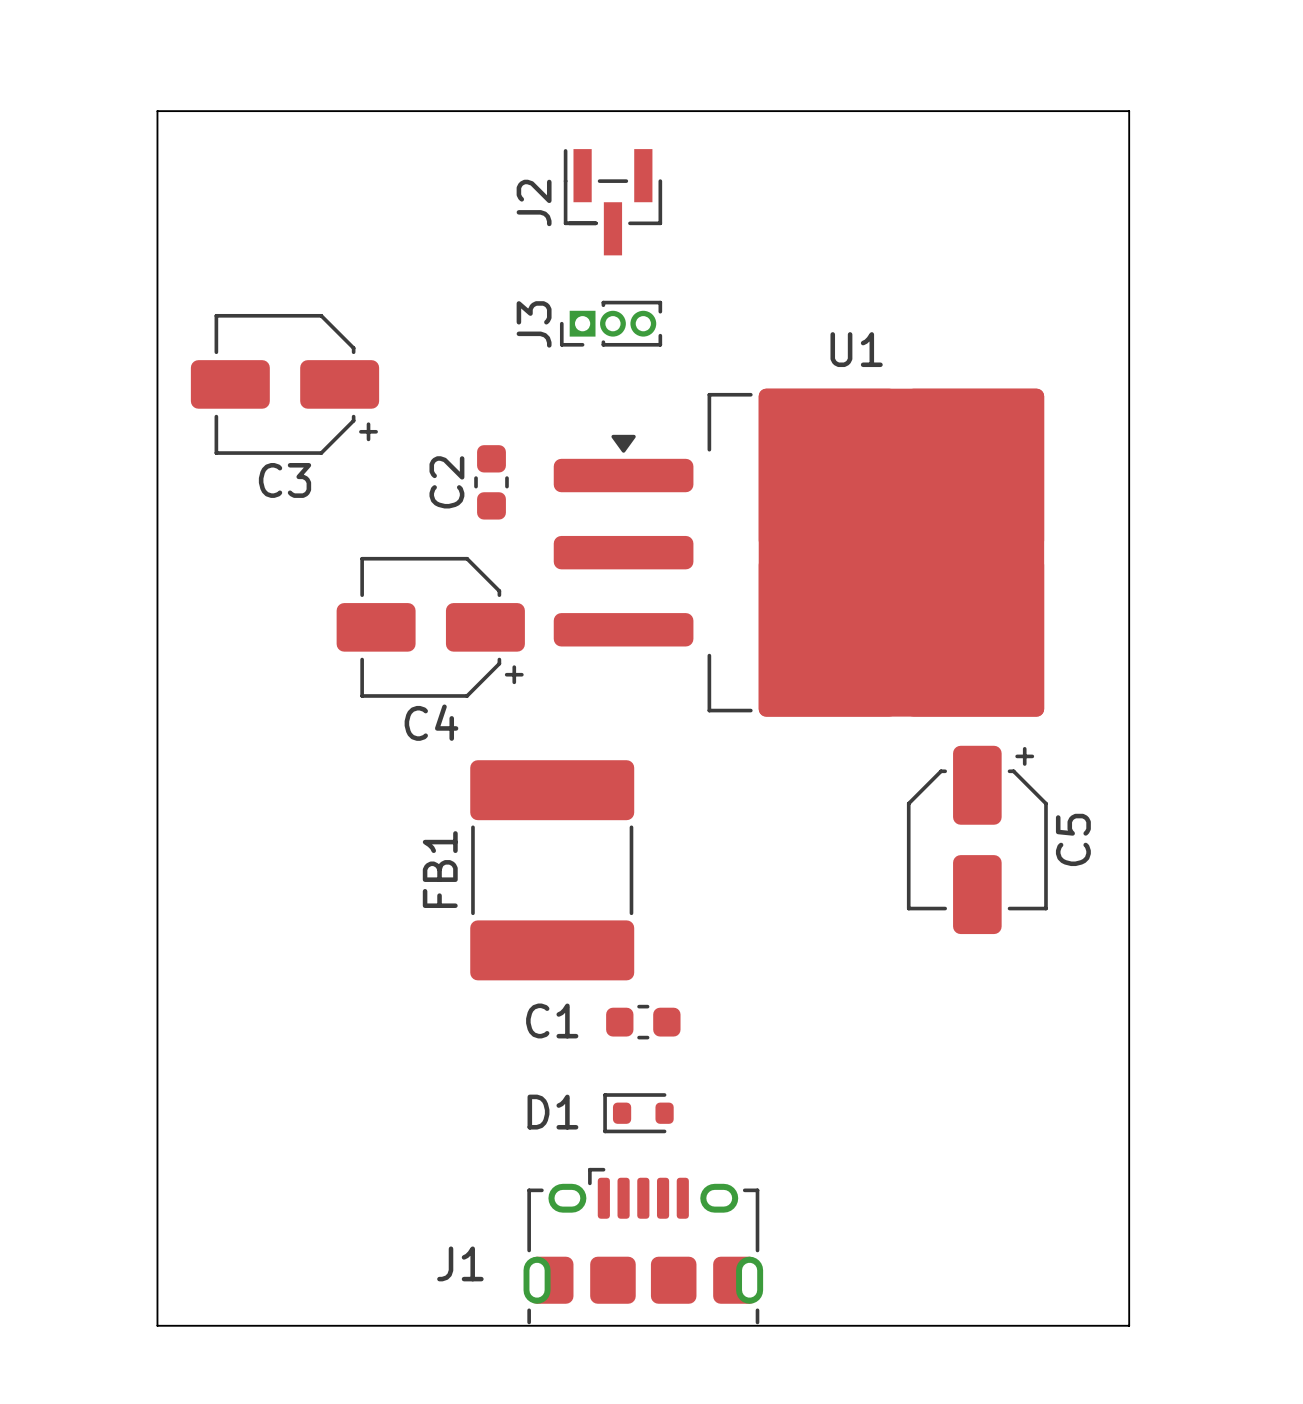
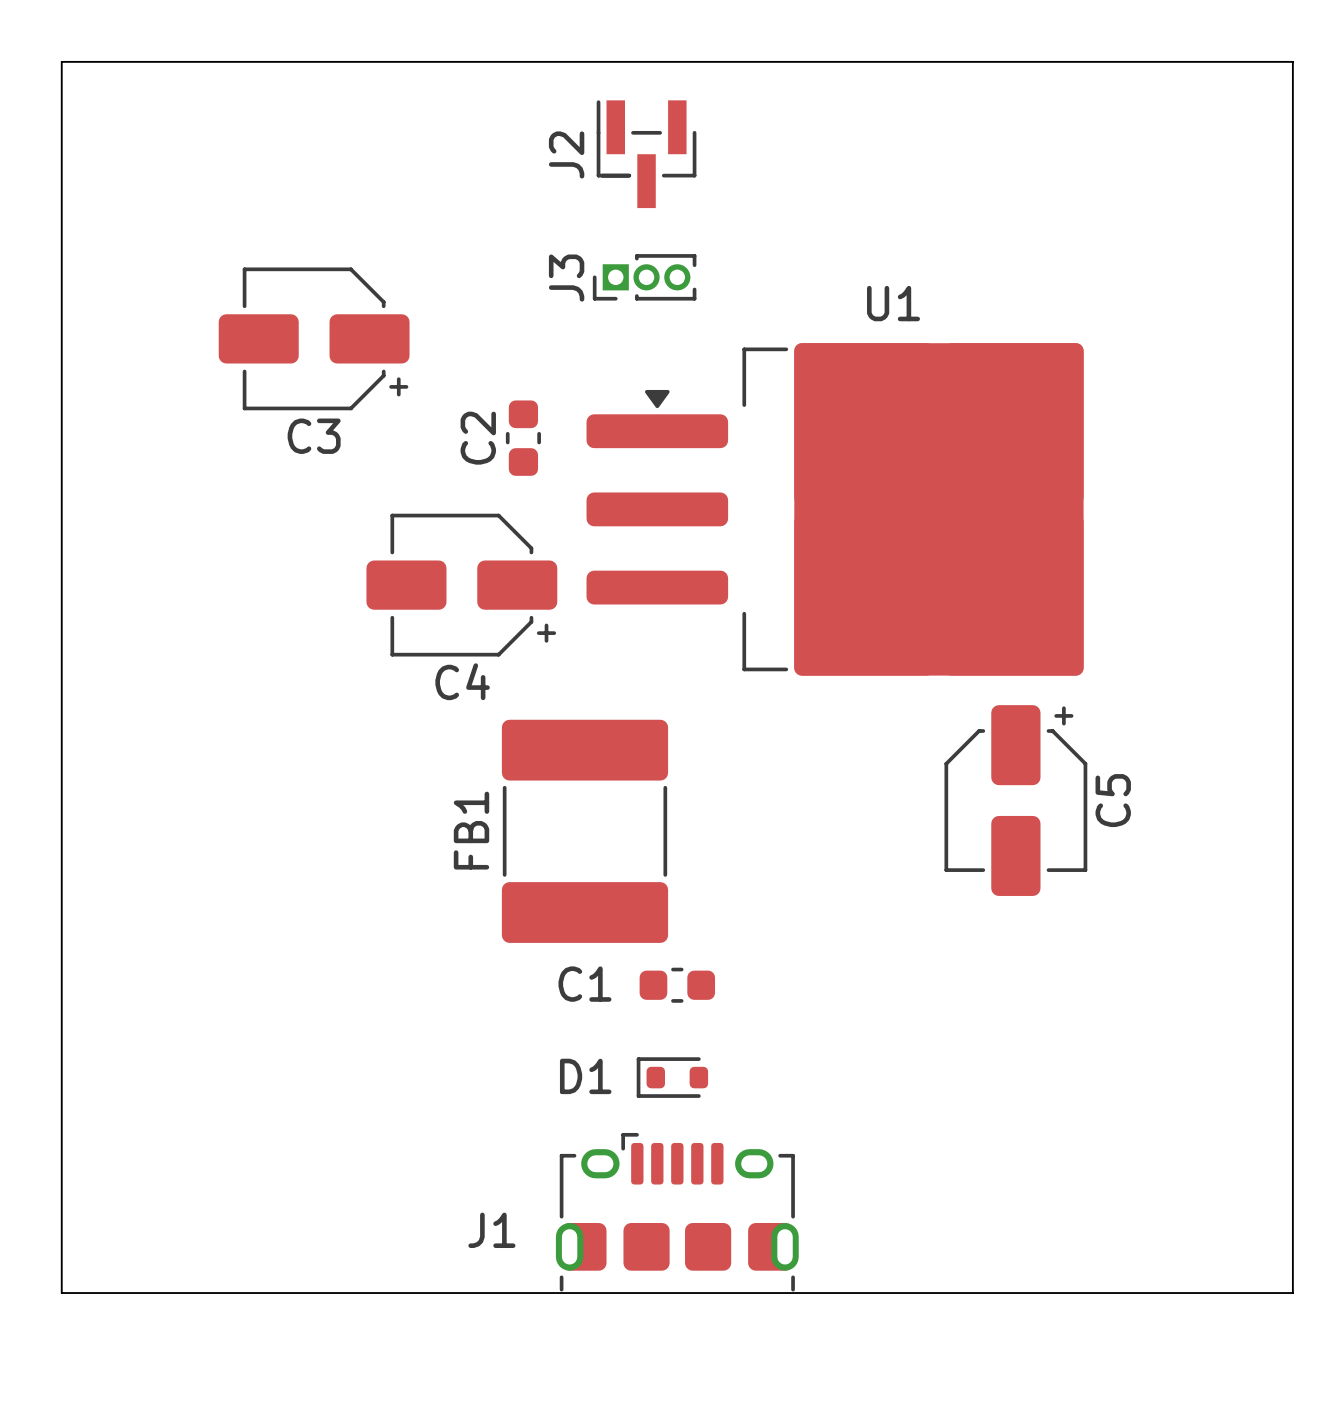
board edge: (157, 111) (157, 1325) -> (184, 61) (61, 61) (61, 1293) (184, 1293)
board edge: (1129, 111) (1129, 1325) -> (1169, 61) (1292, 61) (1292, 1293) (1169, 1293)

